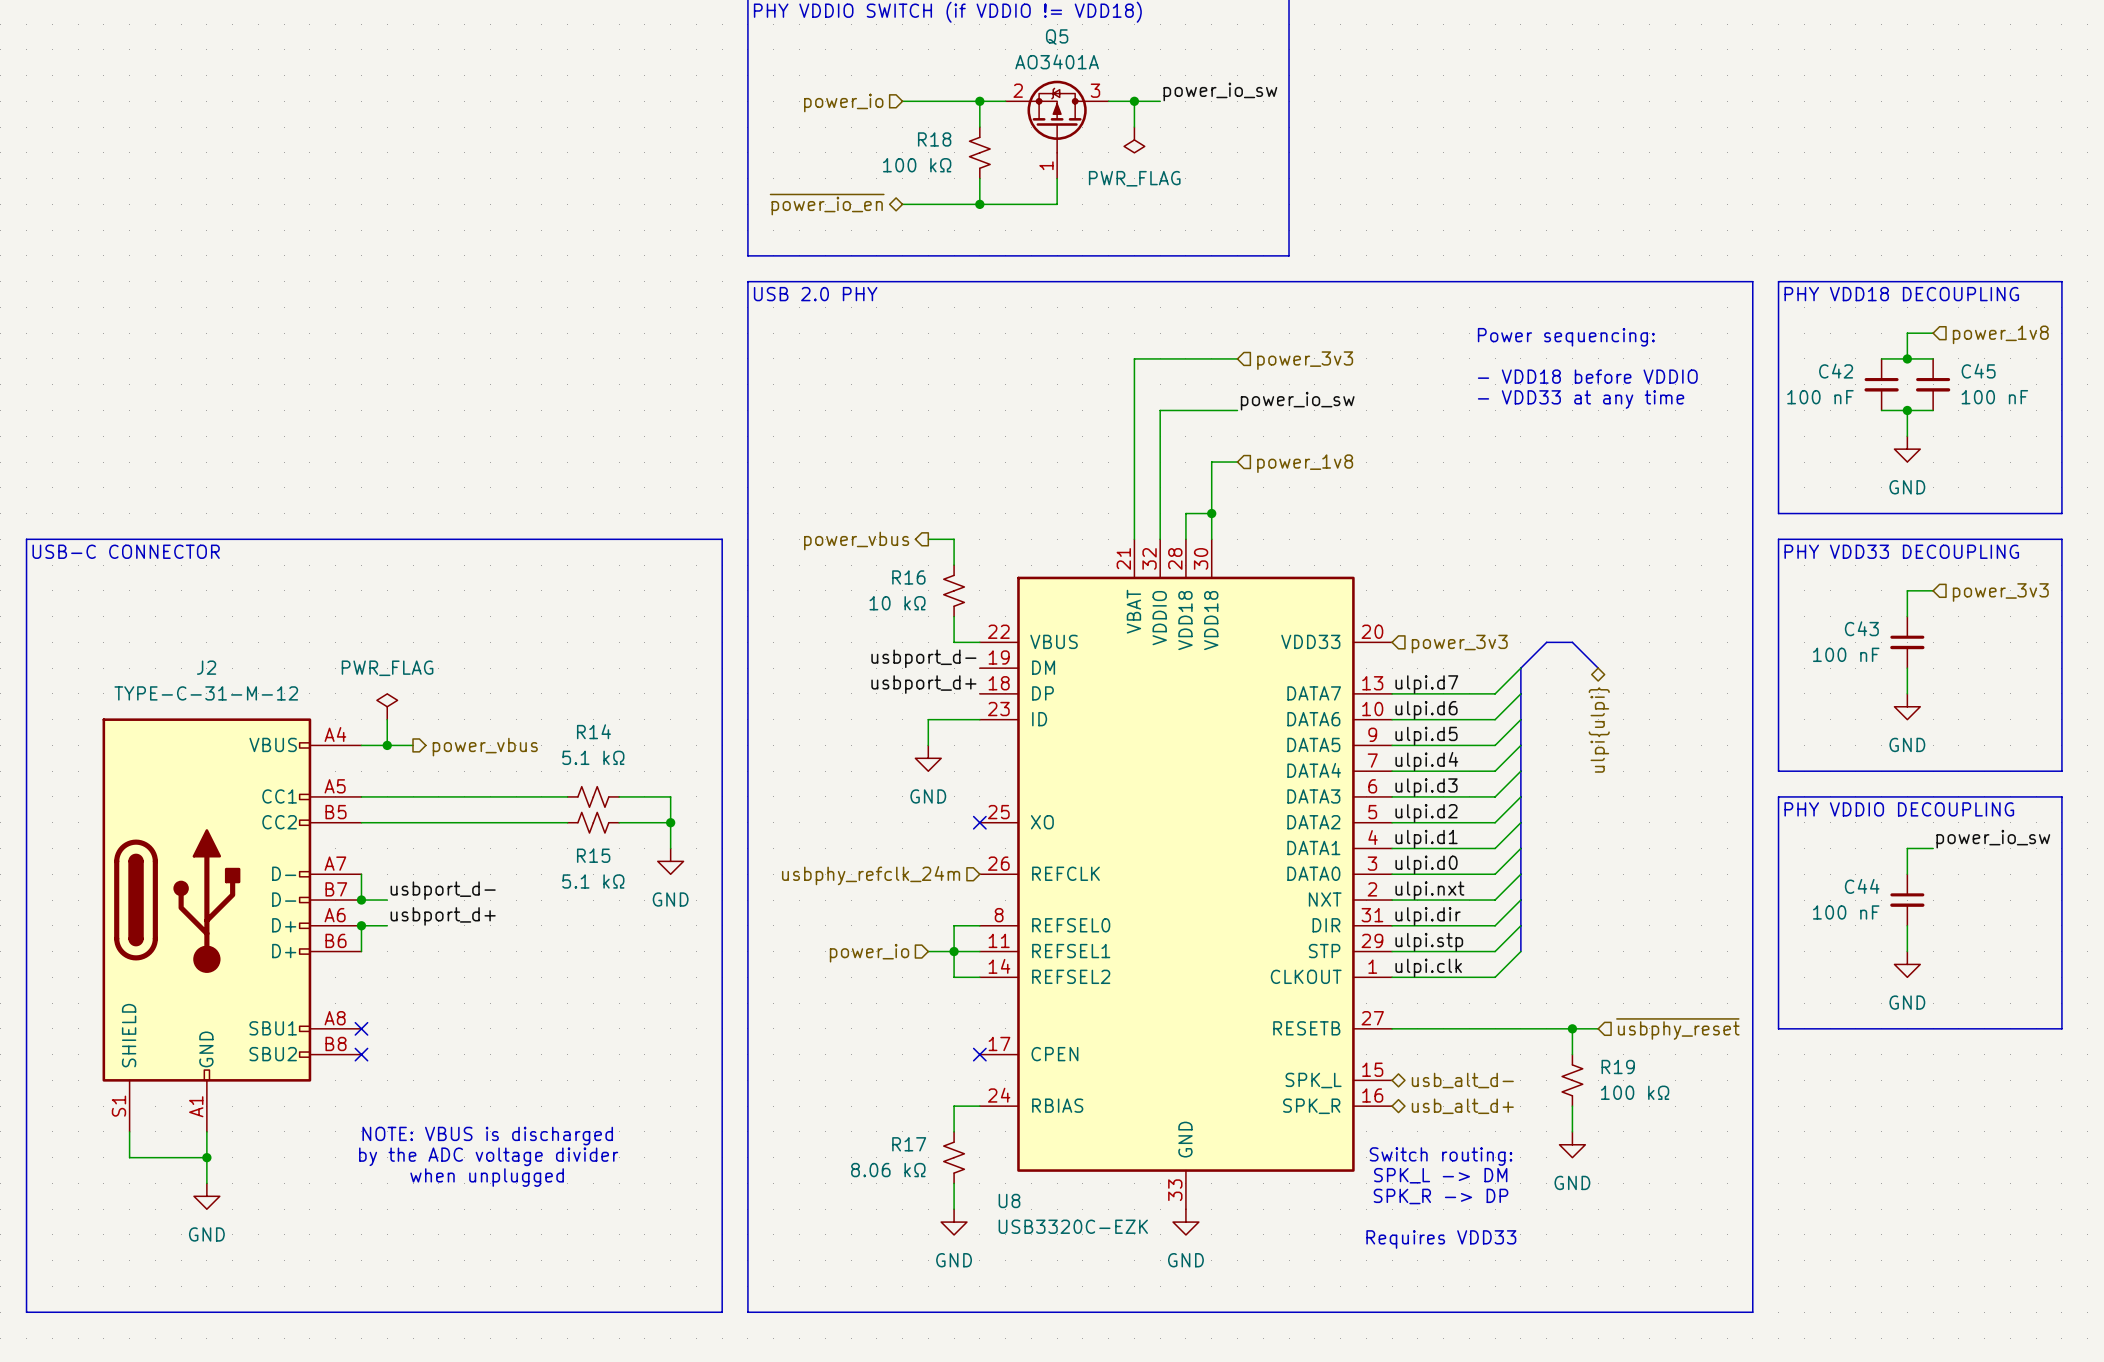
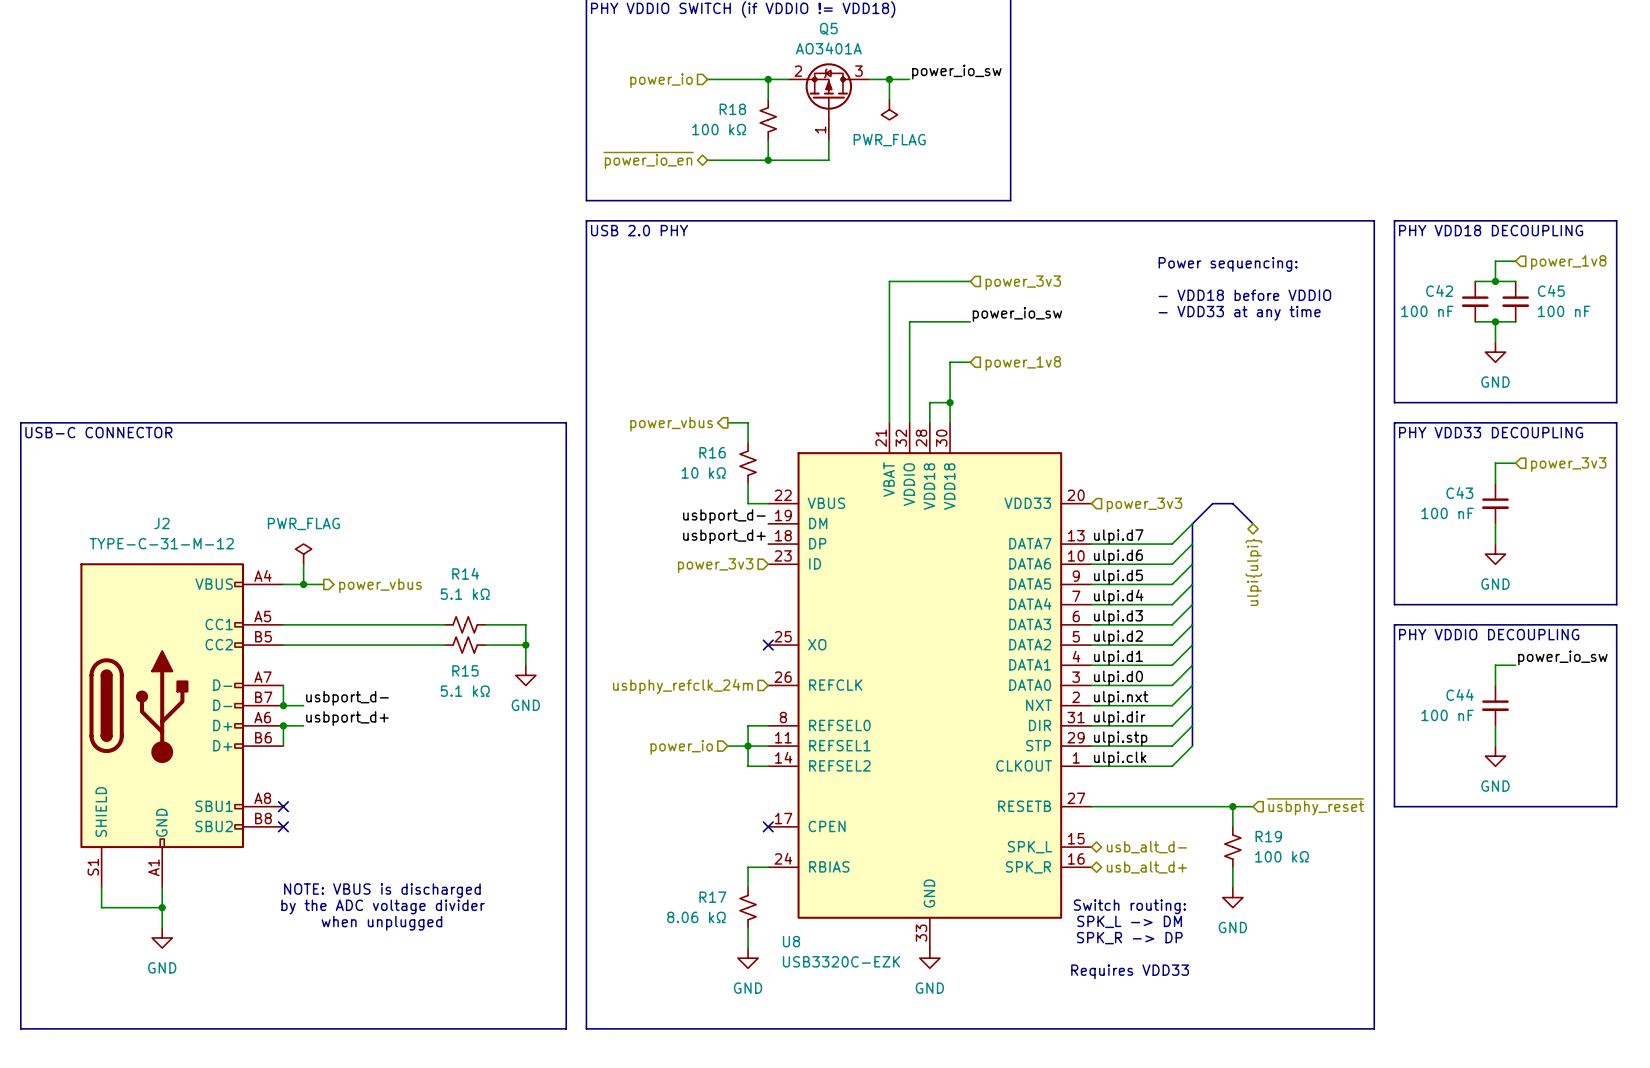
wire: (979, 719) (928, 719) (928, 745) -> none
hierarchical label: none -> power_3v3 (715, 565)
power symbol: GND (928, 758) -> none

